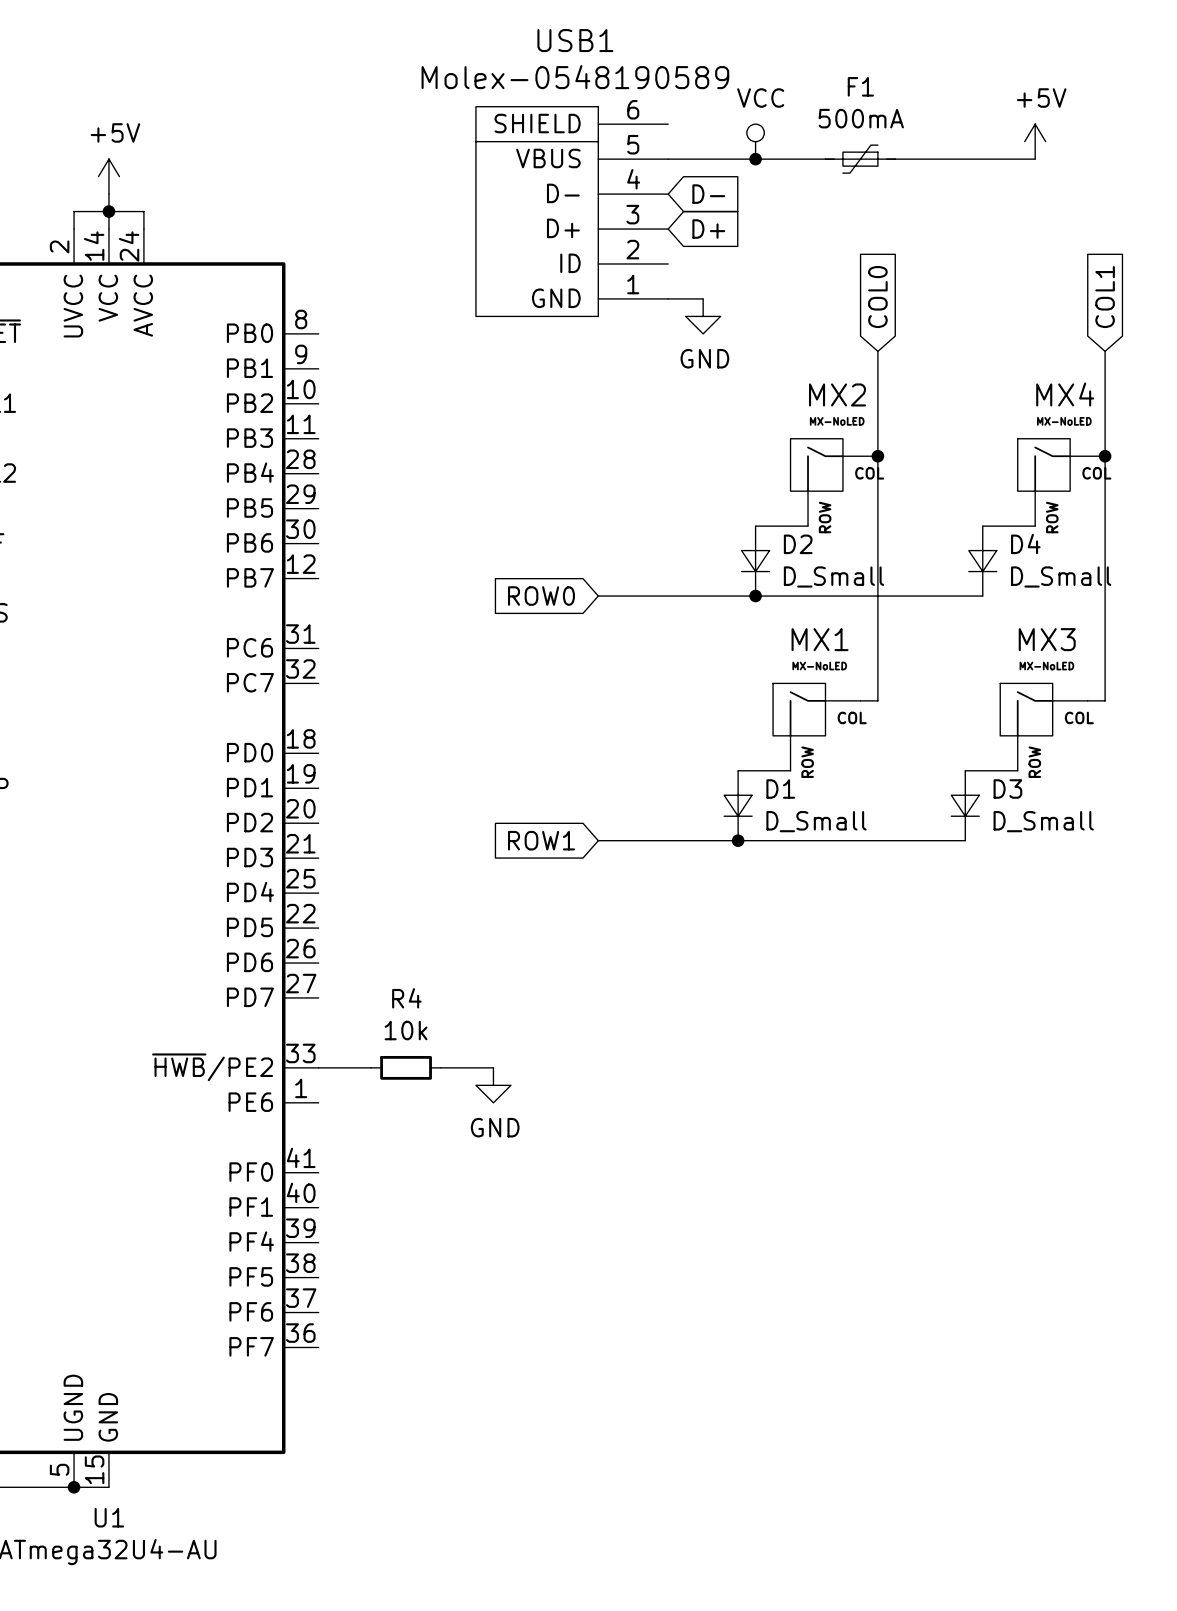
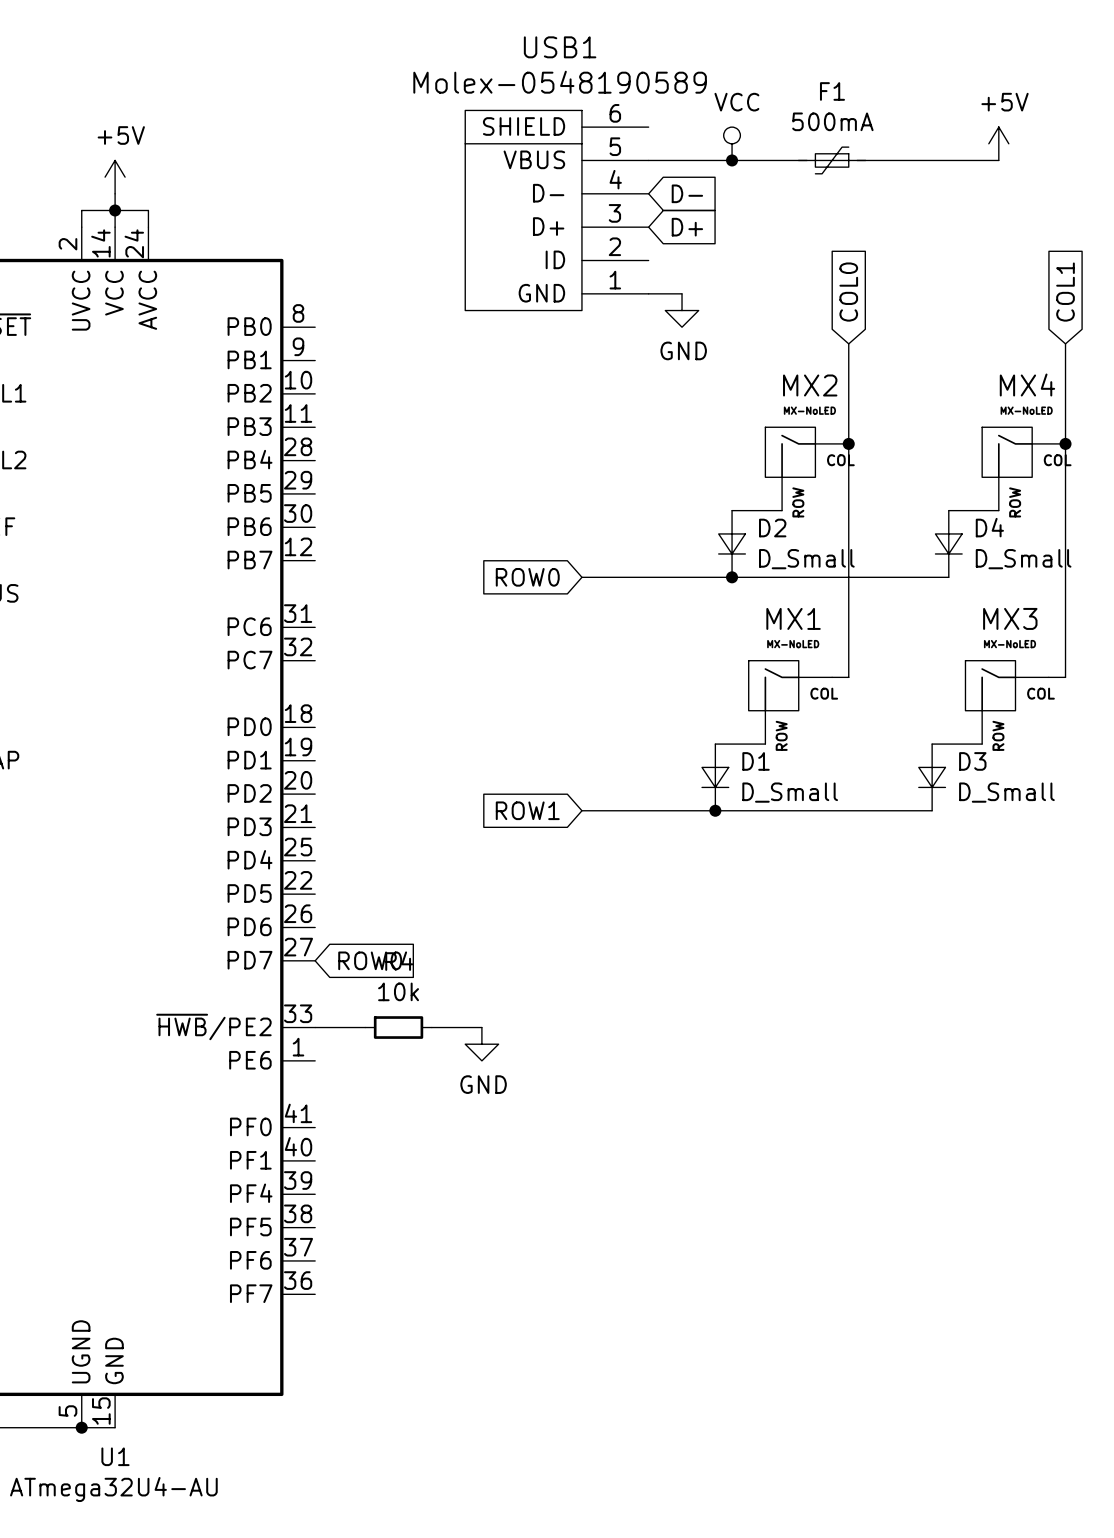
global label: none -> ROW0 (370, 960)

